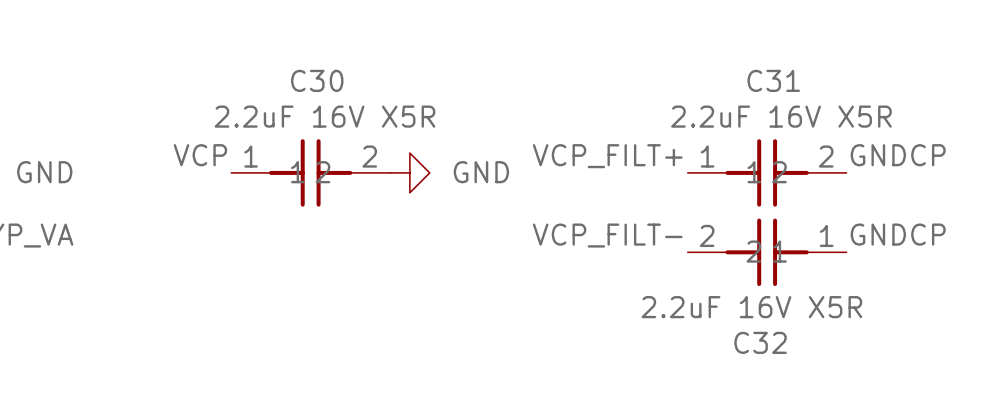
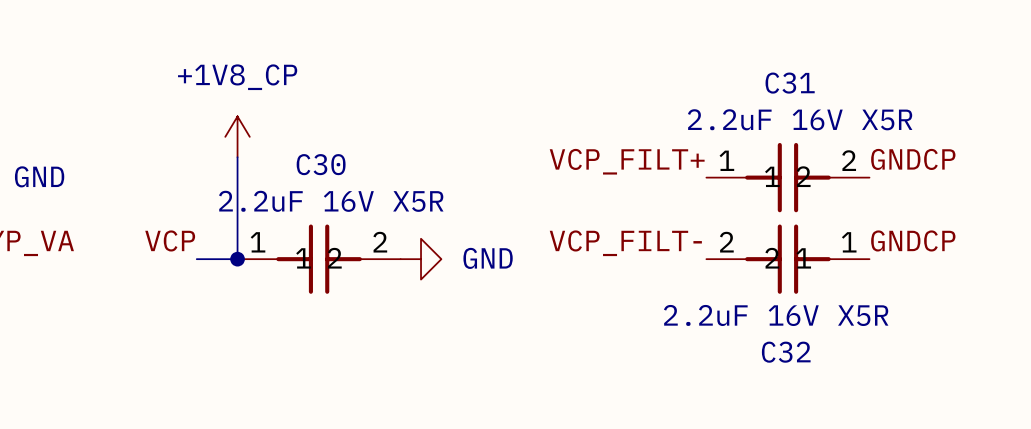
power symbol: none -> +1V8_CP (237, 136)
wire: none -> (237, 157) (237, 259) (196, 259)
label position: VCP (200, 155) -> VCP (170, 240)
C30 position: (310, 172) -> (319, 259)
power symbol position: GND (409, 172) -> GND (421, 259)
junction: none -> (237, 259)

